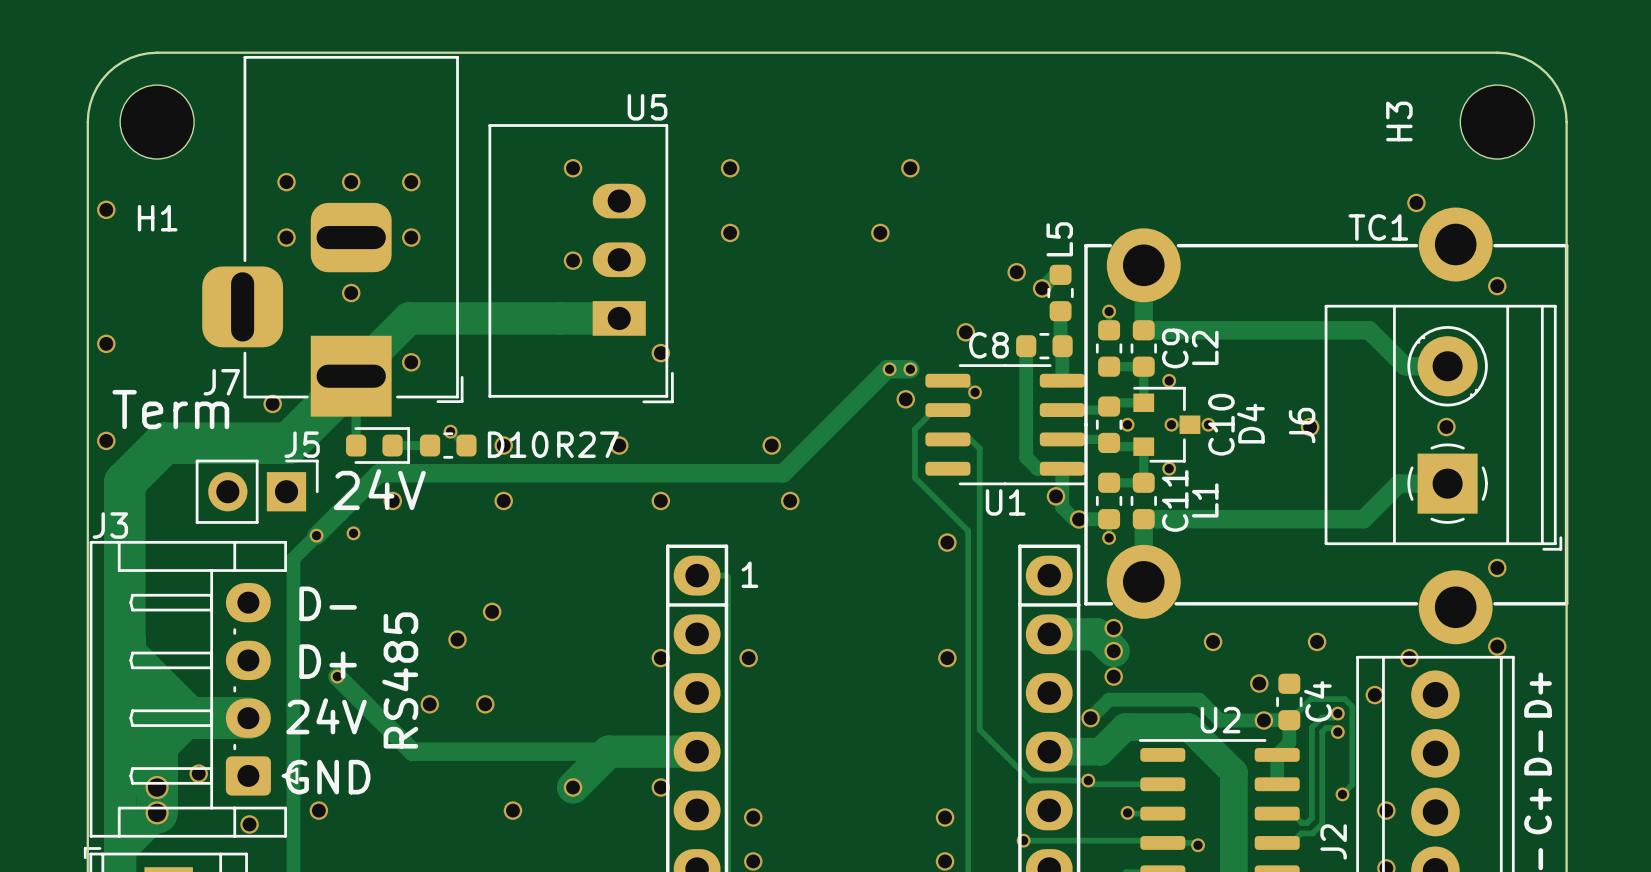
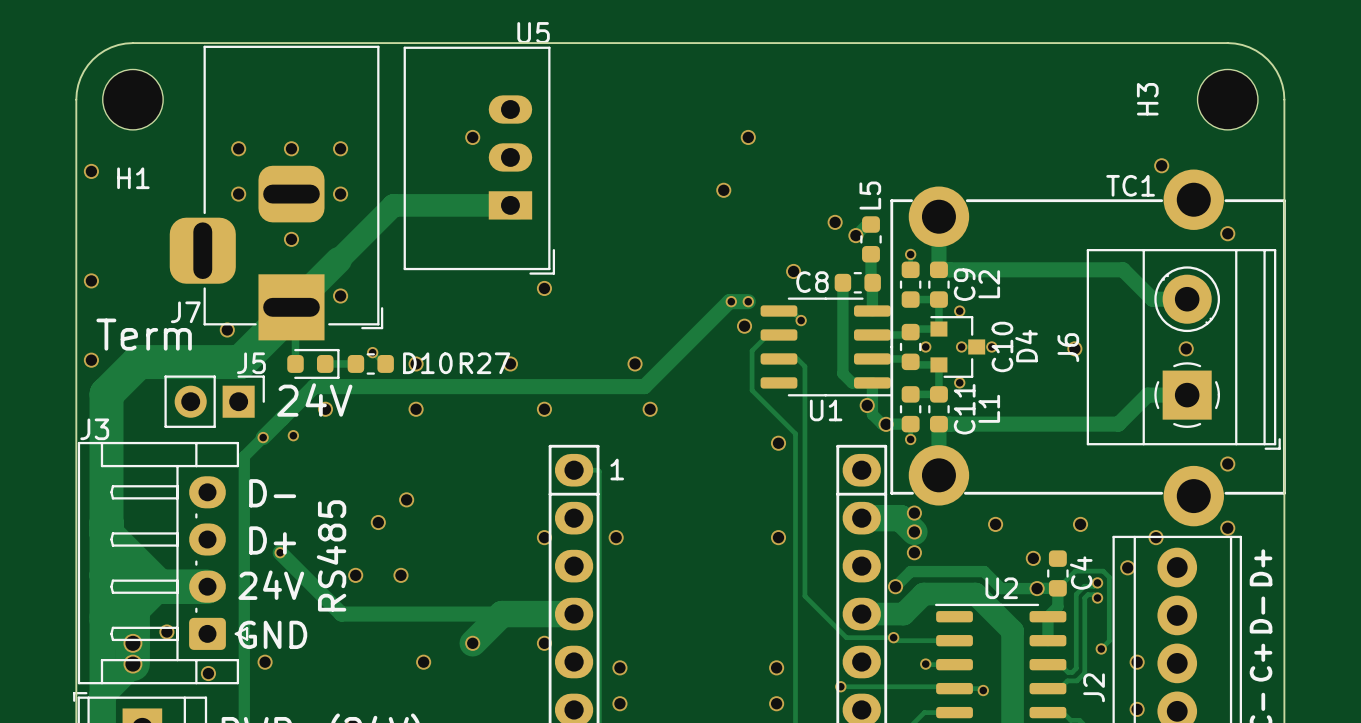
via: (730, 168) -> none
via: (730, 232) -> none
via: (573, 260) -> none
U5 position: (581, 263) -> (479, 160)
track: (408, 318) (619, 318) -> (338, 260) (393, 205) (510, 205)

